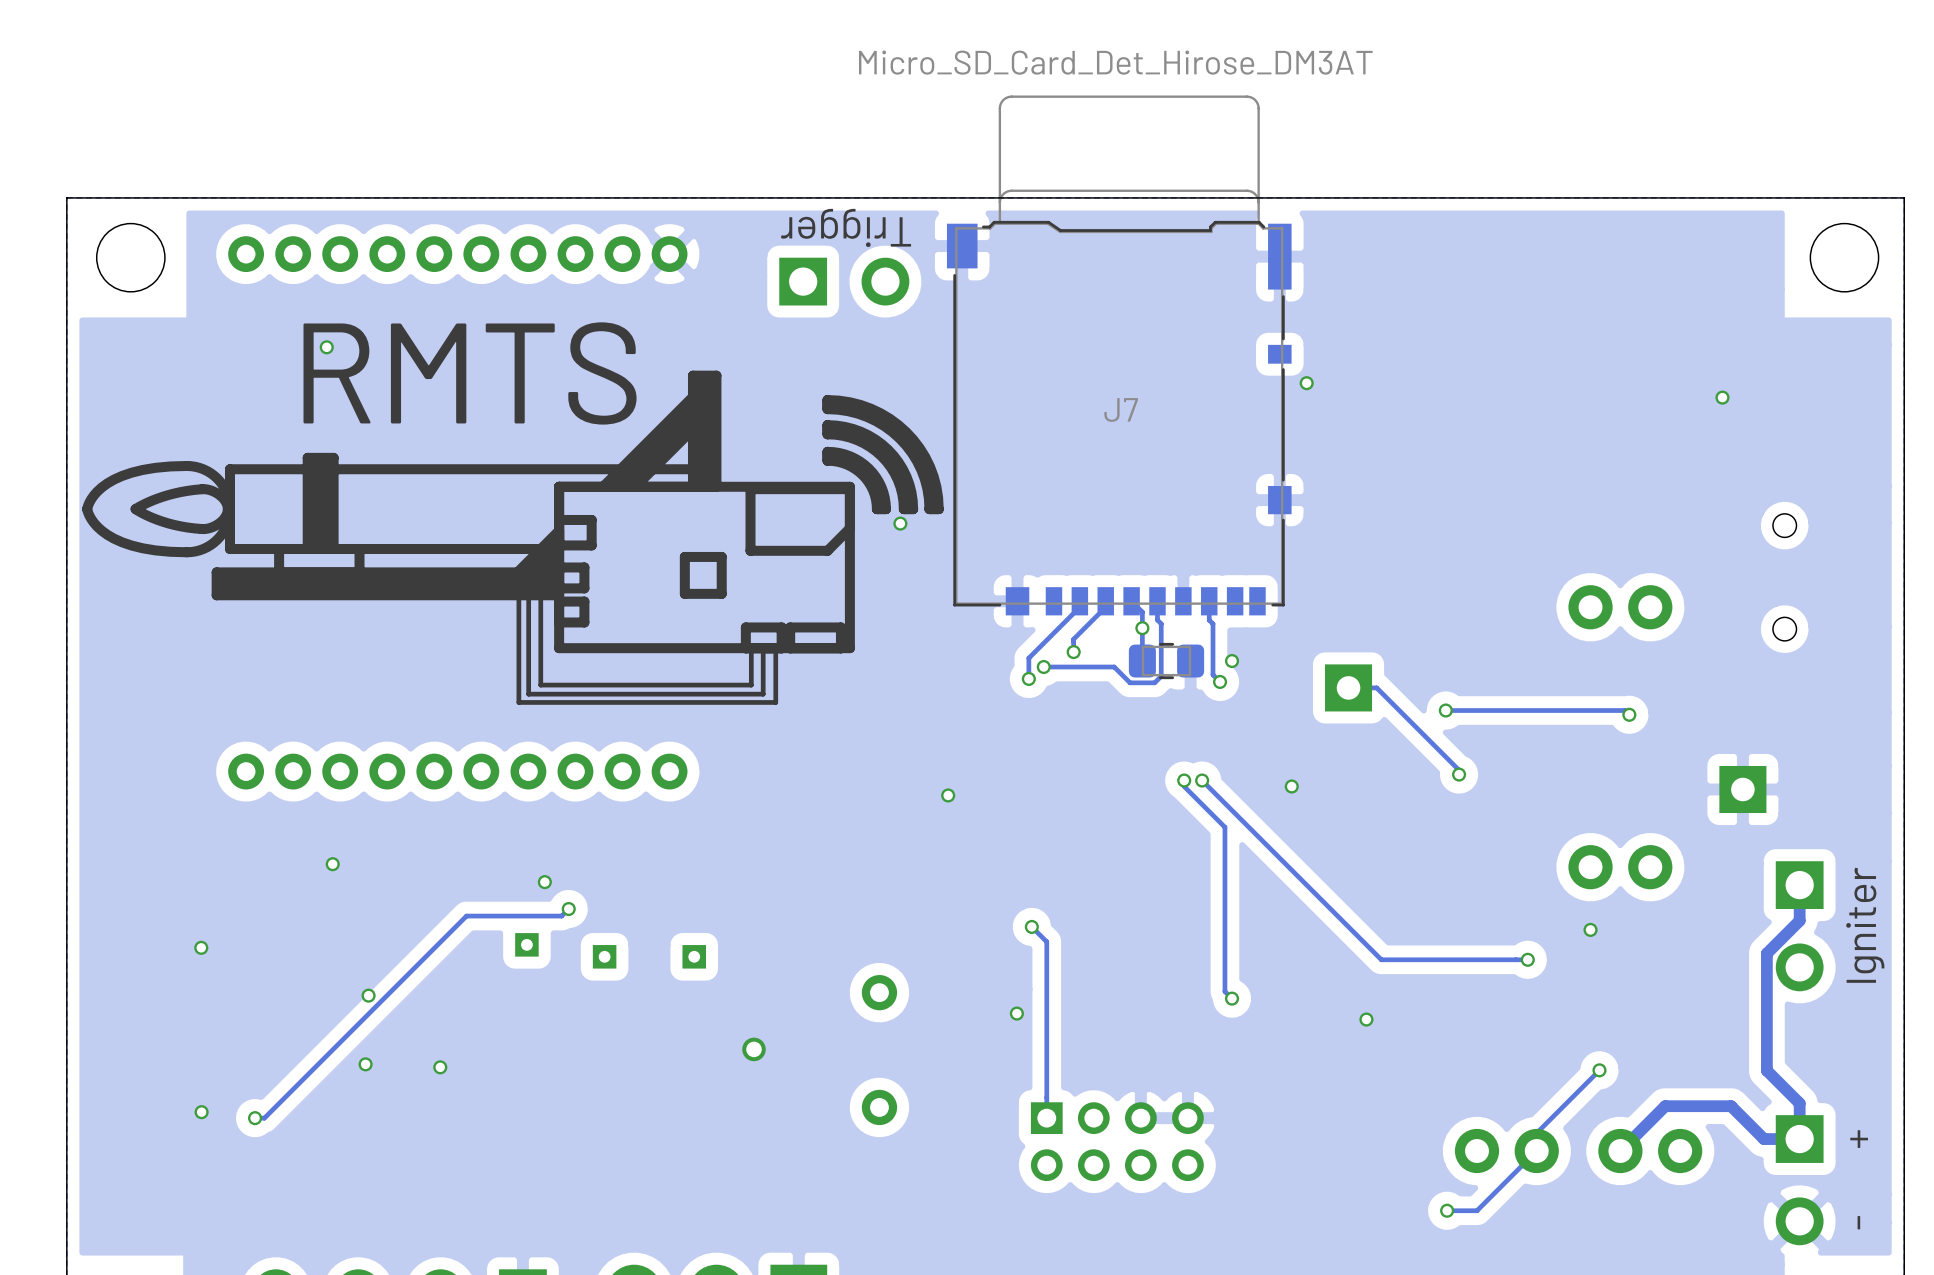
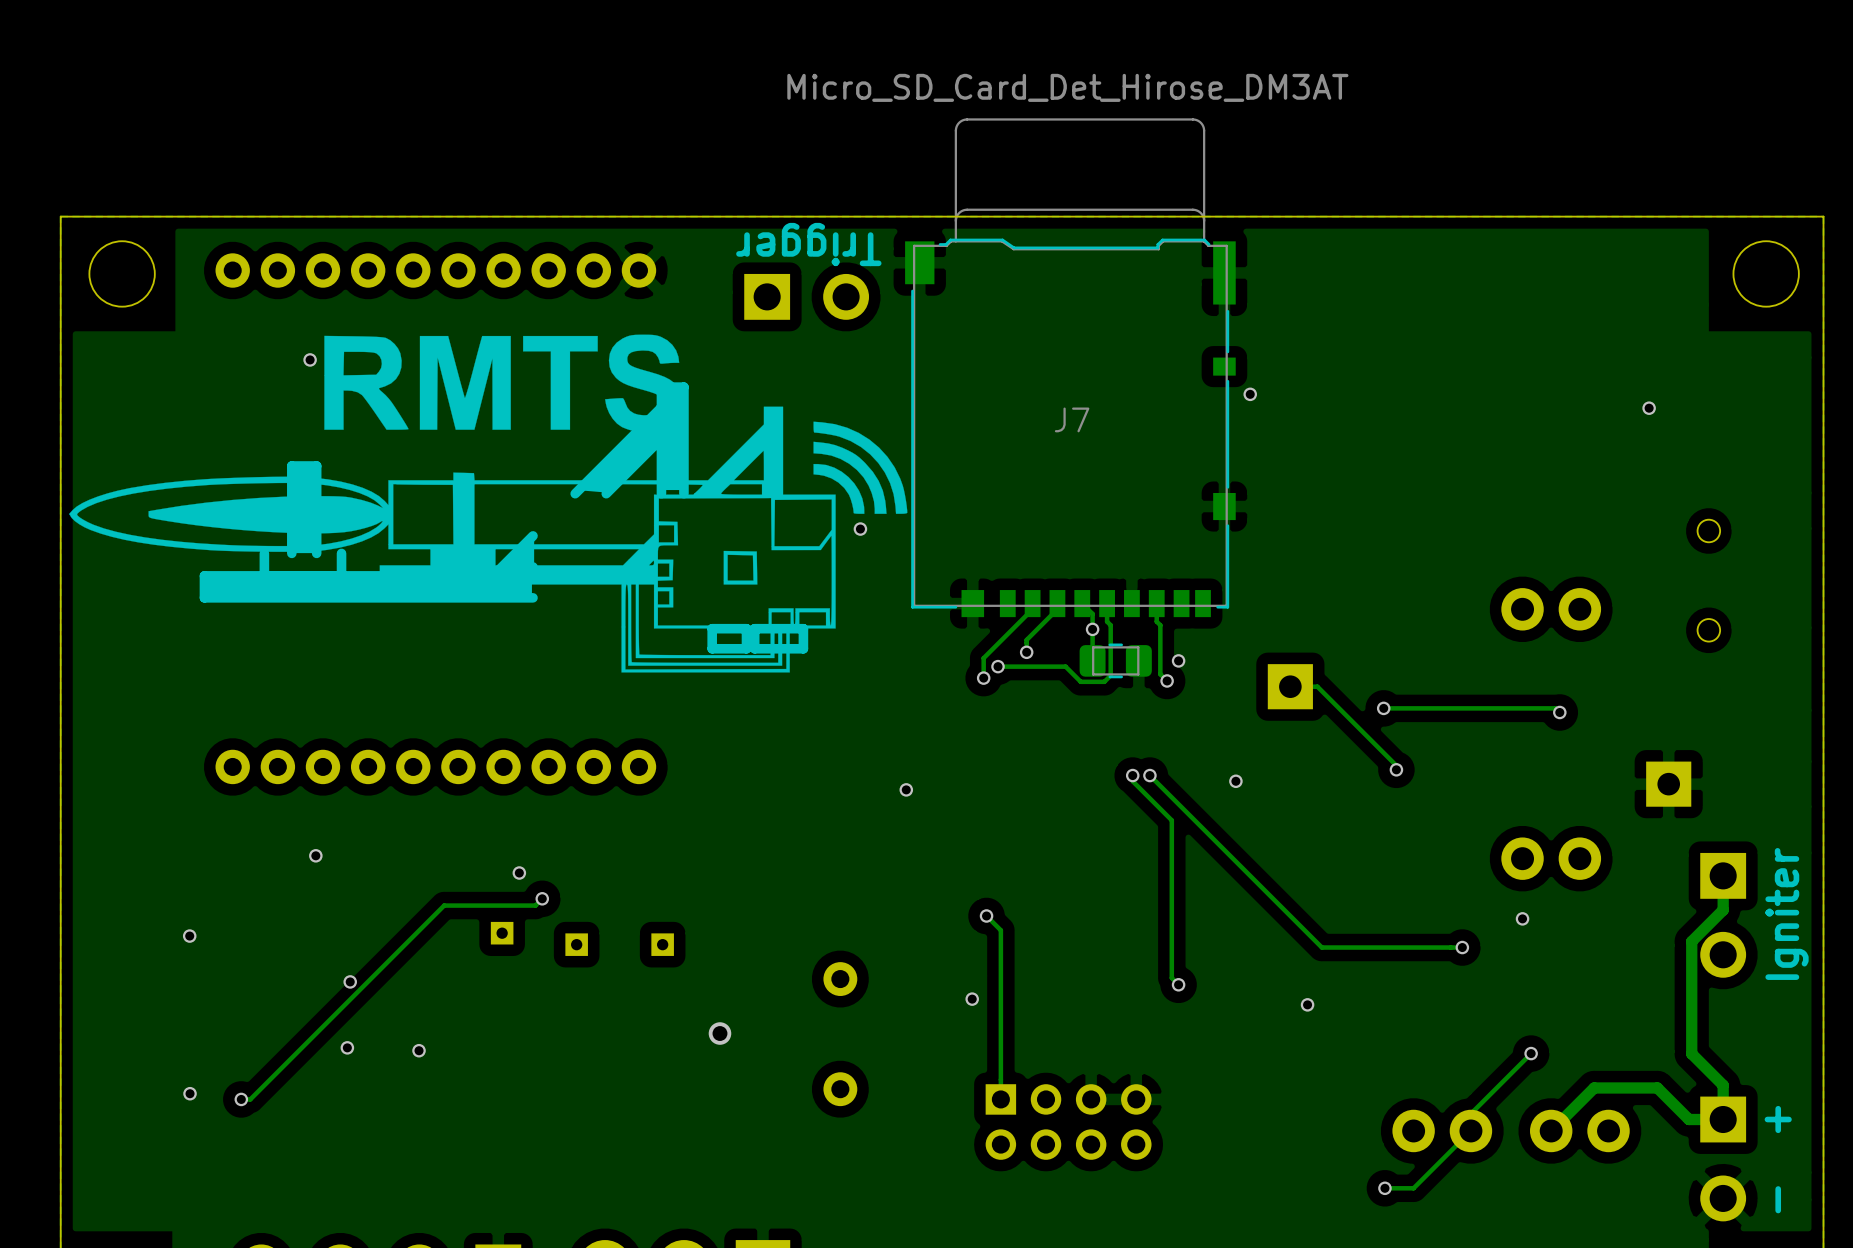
drawing: none -> [69, 334, 908, 673]
text: RMTS (470, 373) -> none
line: (827, 400) (827, 409) (848, 411) (867, 417) (884, 426) (899, 438) (912, 453) (921, 470) (927, 488) (929, 509) (938, 509) (936, 487) (929, 466) (919, 448) (906, 432) (889, 418) (870, 408) (849, 402) (827, 400) -> none
line: (827, 425) (827, 434) (857, 440) (881, 456) (897, 479) (902, 494) (903, 509) (913, 509) (911, 492) (906, 476) (898, 462) (888, 449) (875, 439) (860, 431) (844, 426) (827, 425) -> none
line: (827, 451) (827, 460) (846, 464) (862, 474) (873, 490) (876, 509) (885, 509) (881, 486) (868, 468) (850, 456) (827, 451) -> none
line: (186, 465) (199, 467) (214, 475) (224, 488) (229, 500) (229, 513) (226, 525) (220, 536) (207, 547) (186, 552) (155, 550) (131, 545) (107, 534) (97, 526) (89, 515) (87, 509) (91, 499) (101, 487) (113, 479) (142, 469) (186, 465) -> none
line: (693, 486) (693, 469) (229, 469) (229, 548) (559, 548) -> none
line: (849, 486) (849, 648) (559, 648) (559, 486) (849, 486) -> none
line: (202, 489) (168, 495) (135, 509) (153, 518) (173, 524) (202, 529) (210, 527) (224, 518) (227, 507) (219, 494) (210, 490) (202, 489) -> none
line: (849, 489) (750, 489) (750, 550) (827, 550) (849, 528) -> none
line: (559, 519) (591, 519) (591, 545) (559, 545) -> none
line: (721, 556) (721, 593) (684, 593) (684, 556) (721, 556) -> none
line: (559, 567) (584, 567) (584, 588) (559, 588) -> none
line: (518, 593) (518, 702) (775, 702) (775, 648) -> none
line: (559, 601) (584, 601) (584, 622) (559, 622) -> none
line: (763, 648) (763, 694) (528, 694) (528, 590) (540, 593) (540, 685) (751, 685) (751, 648) -> none

